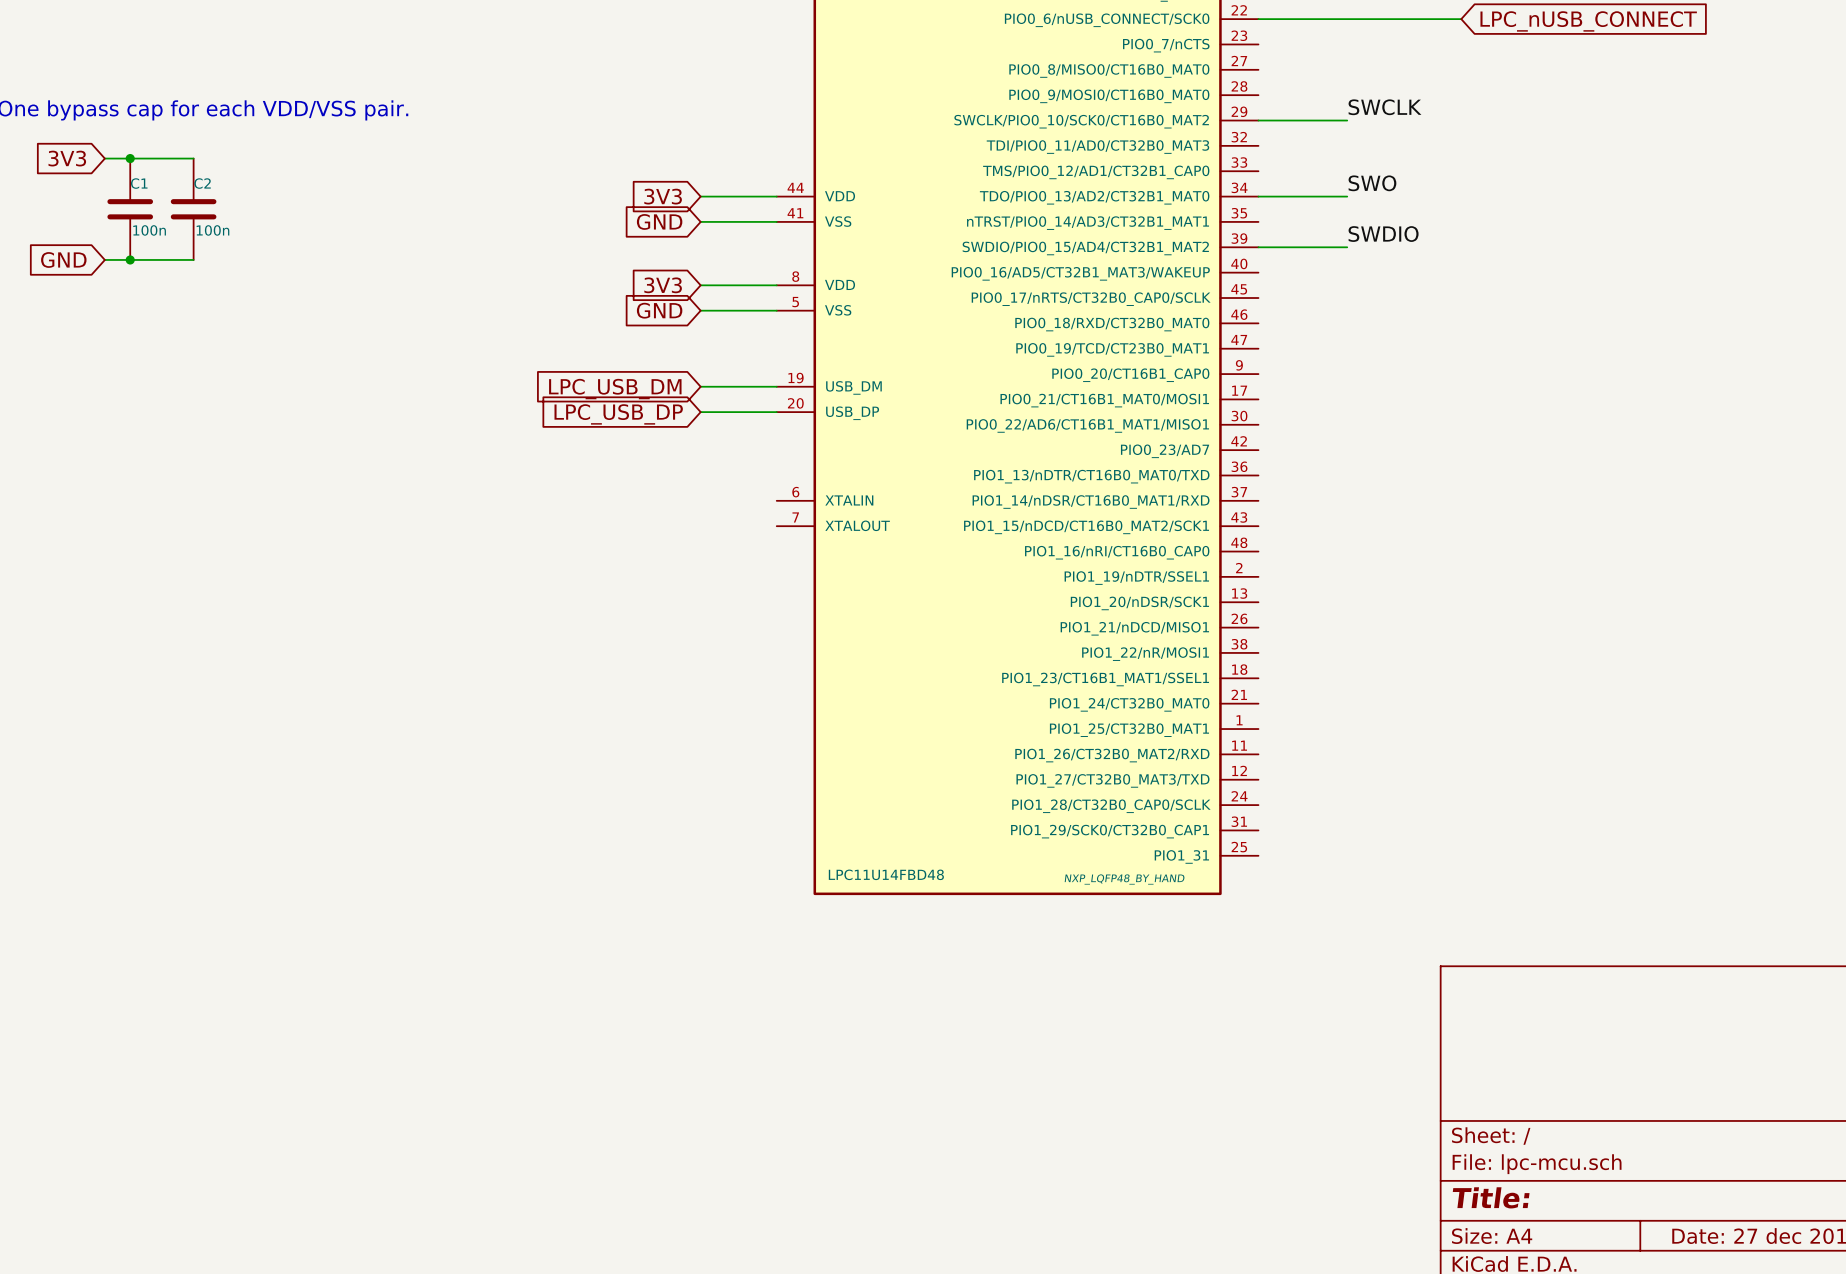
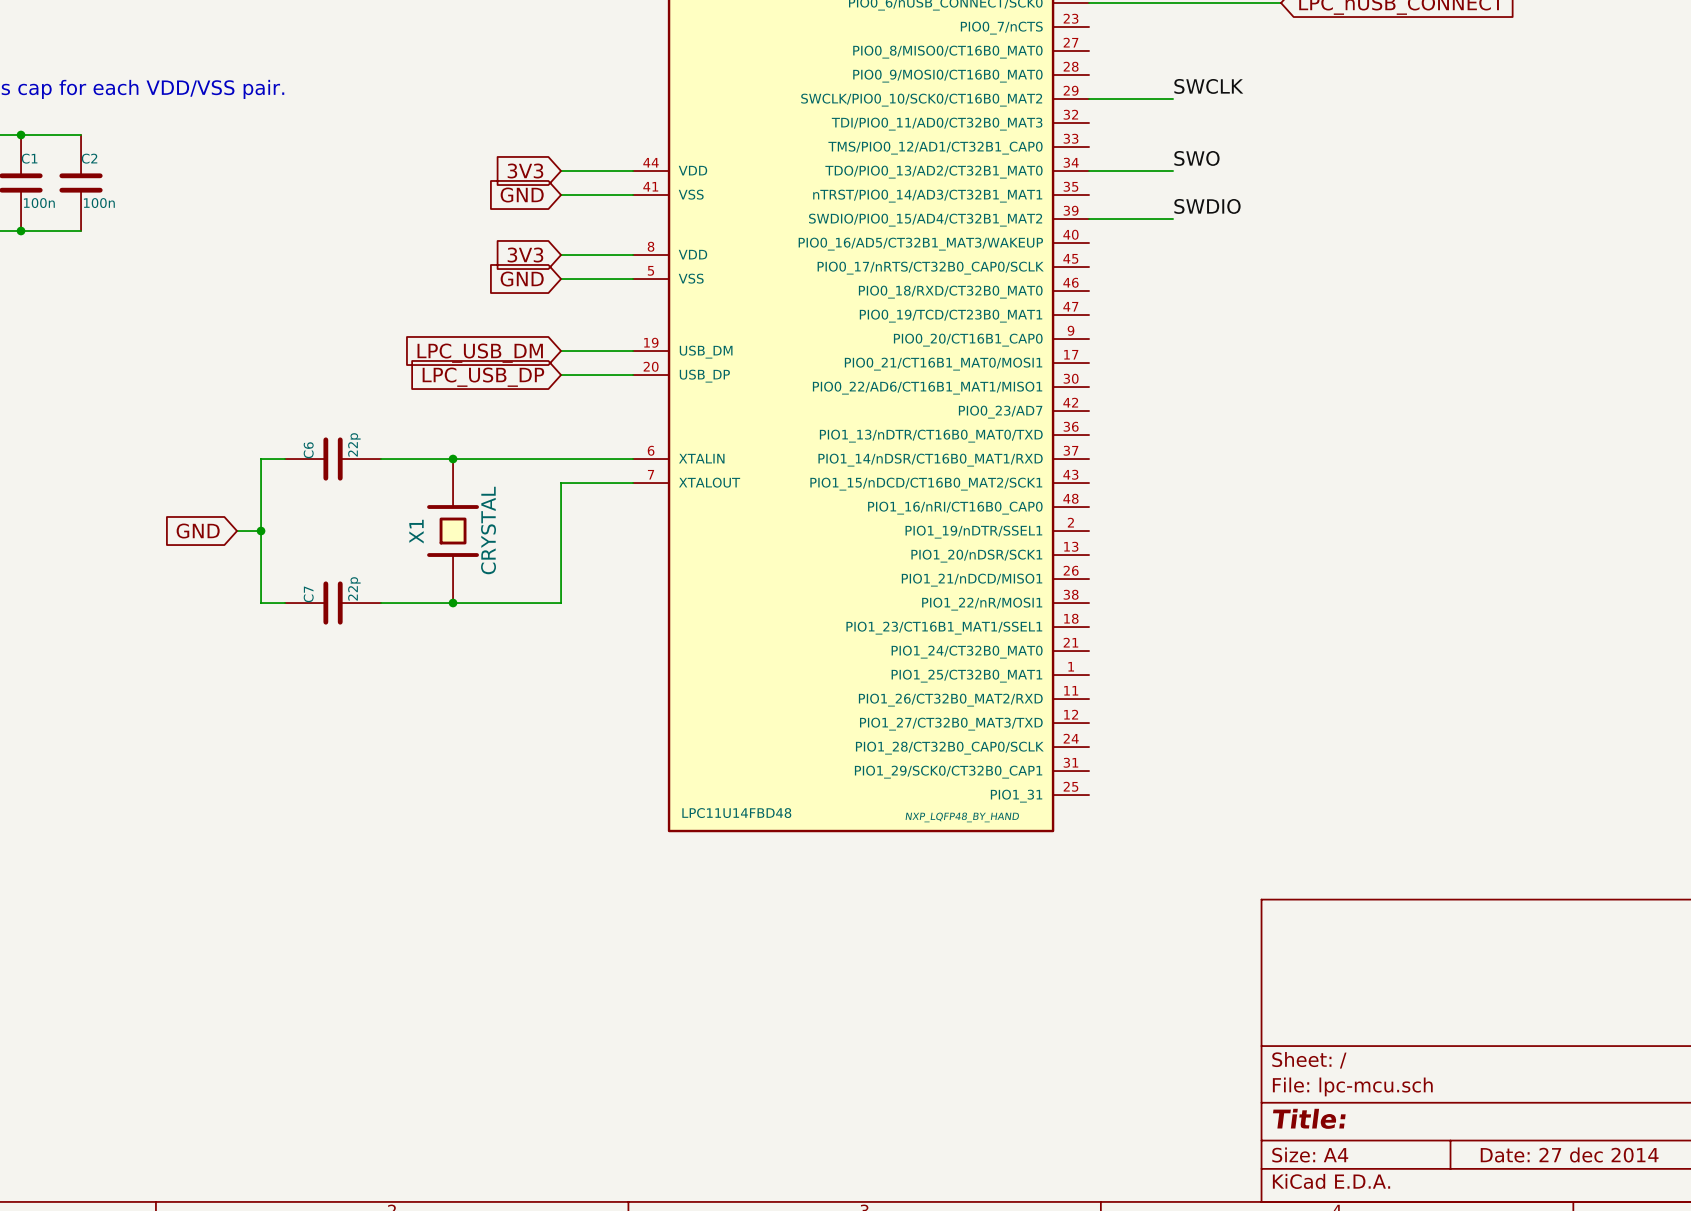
wire: none -> (285, 459) (261, 459) (261, 603) (285, 603)
C6: none -> 22p (333, 459)
wire: none -> (381, 459) (633, 459)
junction: none -> (453, 459)
wire: none -> (633, 483) (561, 483) (561, 603) (381, 603)
global label: none -> GND (198, 531)
wire: none -> (237, 531) (261, 531)
junction: none -> (261, 531)
X1: none -> CRYSTAL (453, 531)
C7: none -> 22p (333, 603)
junction: none -> (453, 603)

